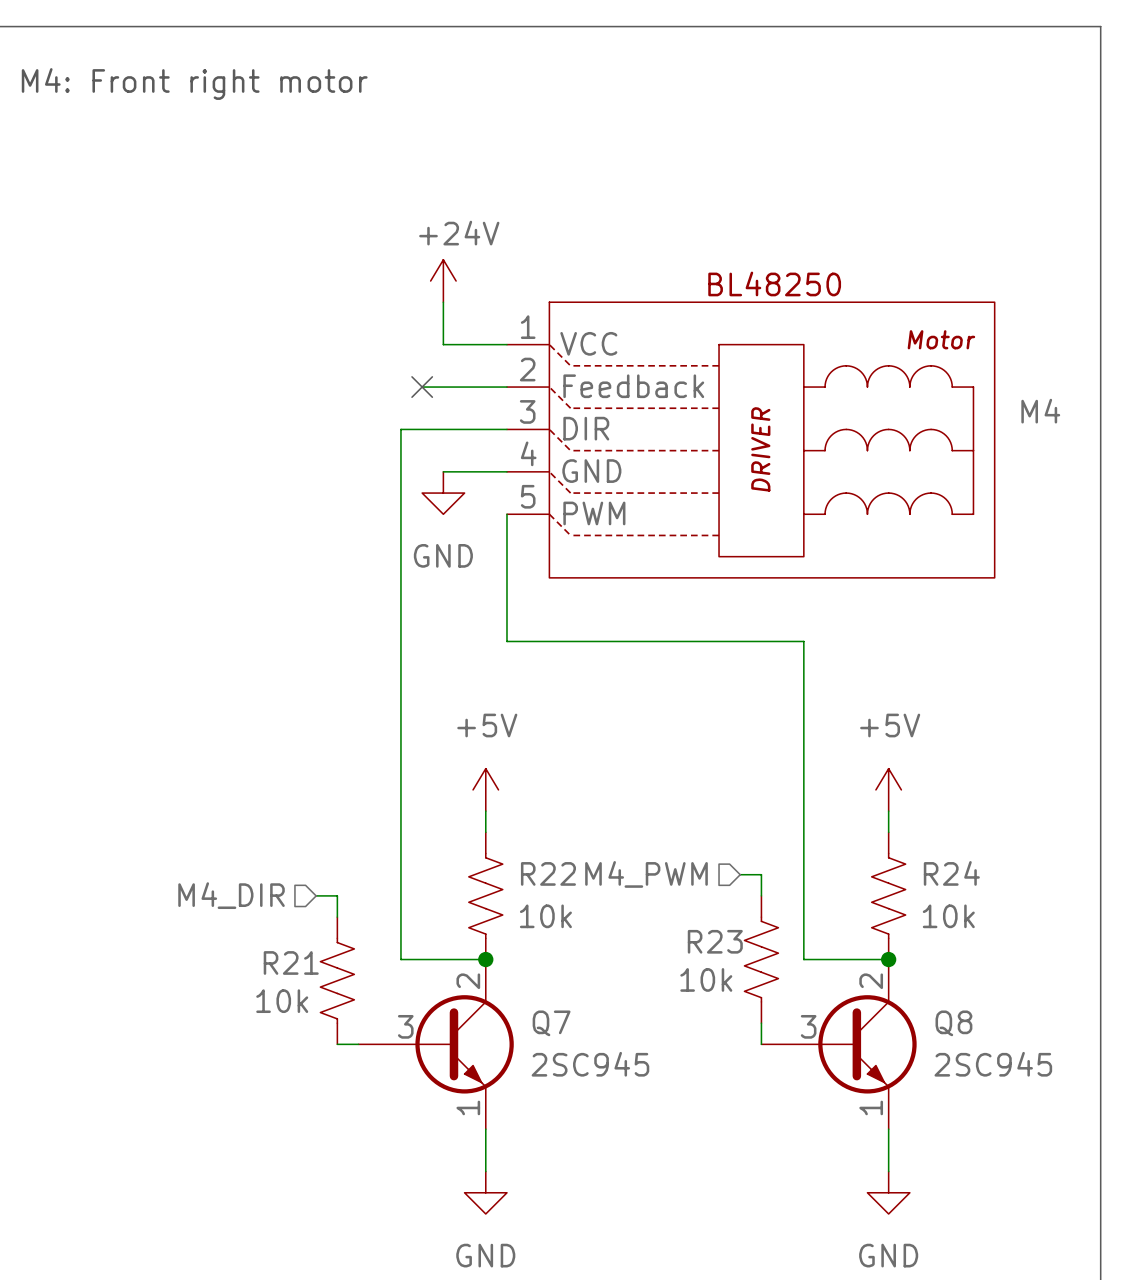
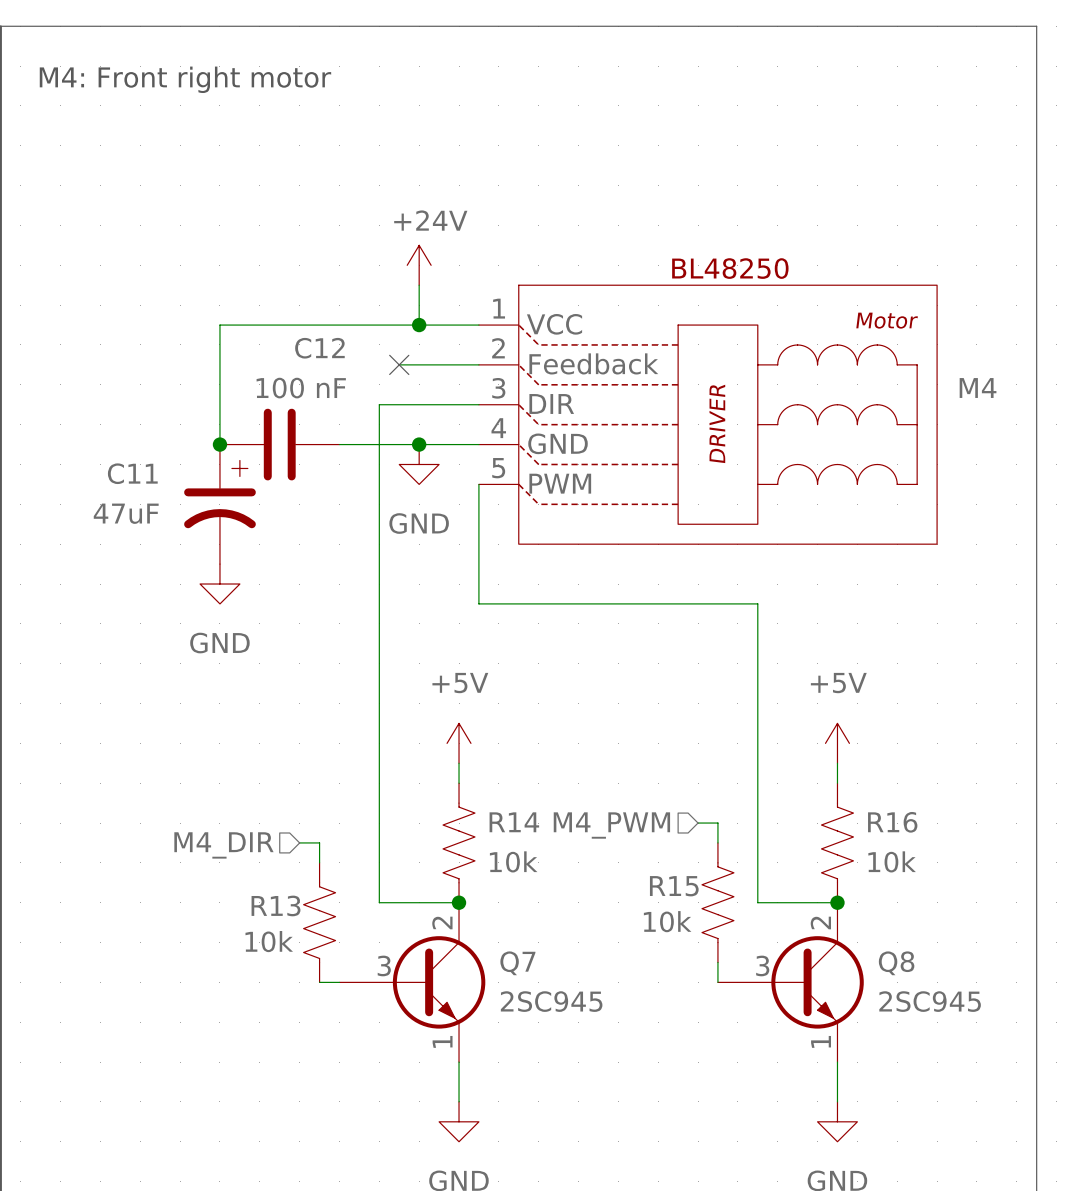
wire: none -> (419, 325) (219, 325) (219, 444)
junction: none -> (419, 325)
junction: none -> (219, 444)
C12: none -> 100 nF (279, 444)
wire: none -> (339, 444) (419, 444)
junction: none -> (419, 444)
C11: none -> 47uF (219, 504)
power symbol: none -> GND (219, 584)
R22 name: R22 (548, 873) -> R14 (514, 822)
R24 name: R24 (951, 873) -> R16 (892, 822)
R23 name: R23 (715, 941) -> R15 (674, 886)
R21 name: R21 (291, 962) -> R13 (276, 905)

